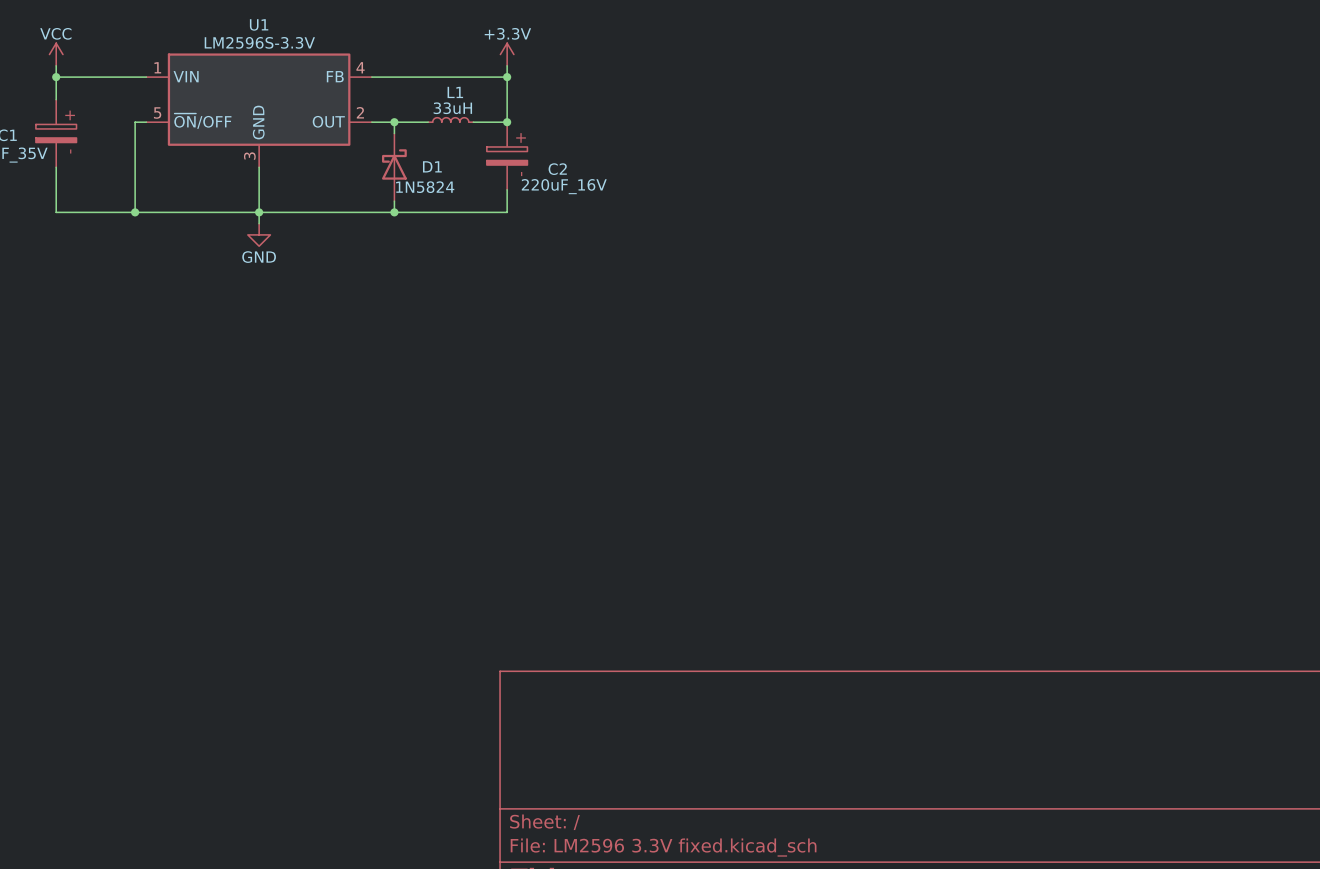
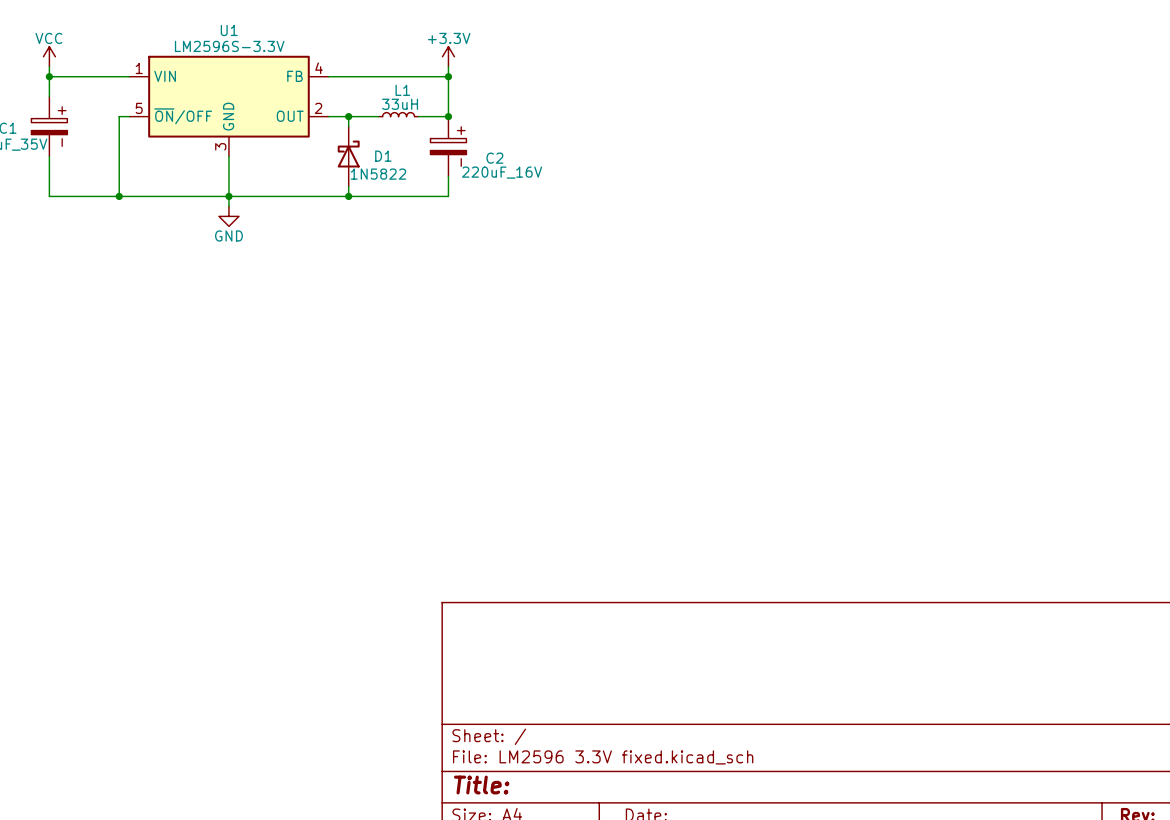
D1 value: 1N5824 (425, 187) -> 1N5822 (378, 174)

